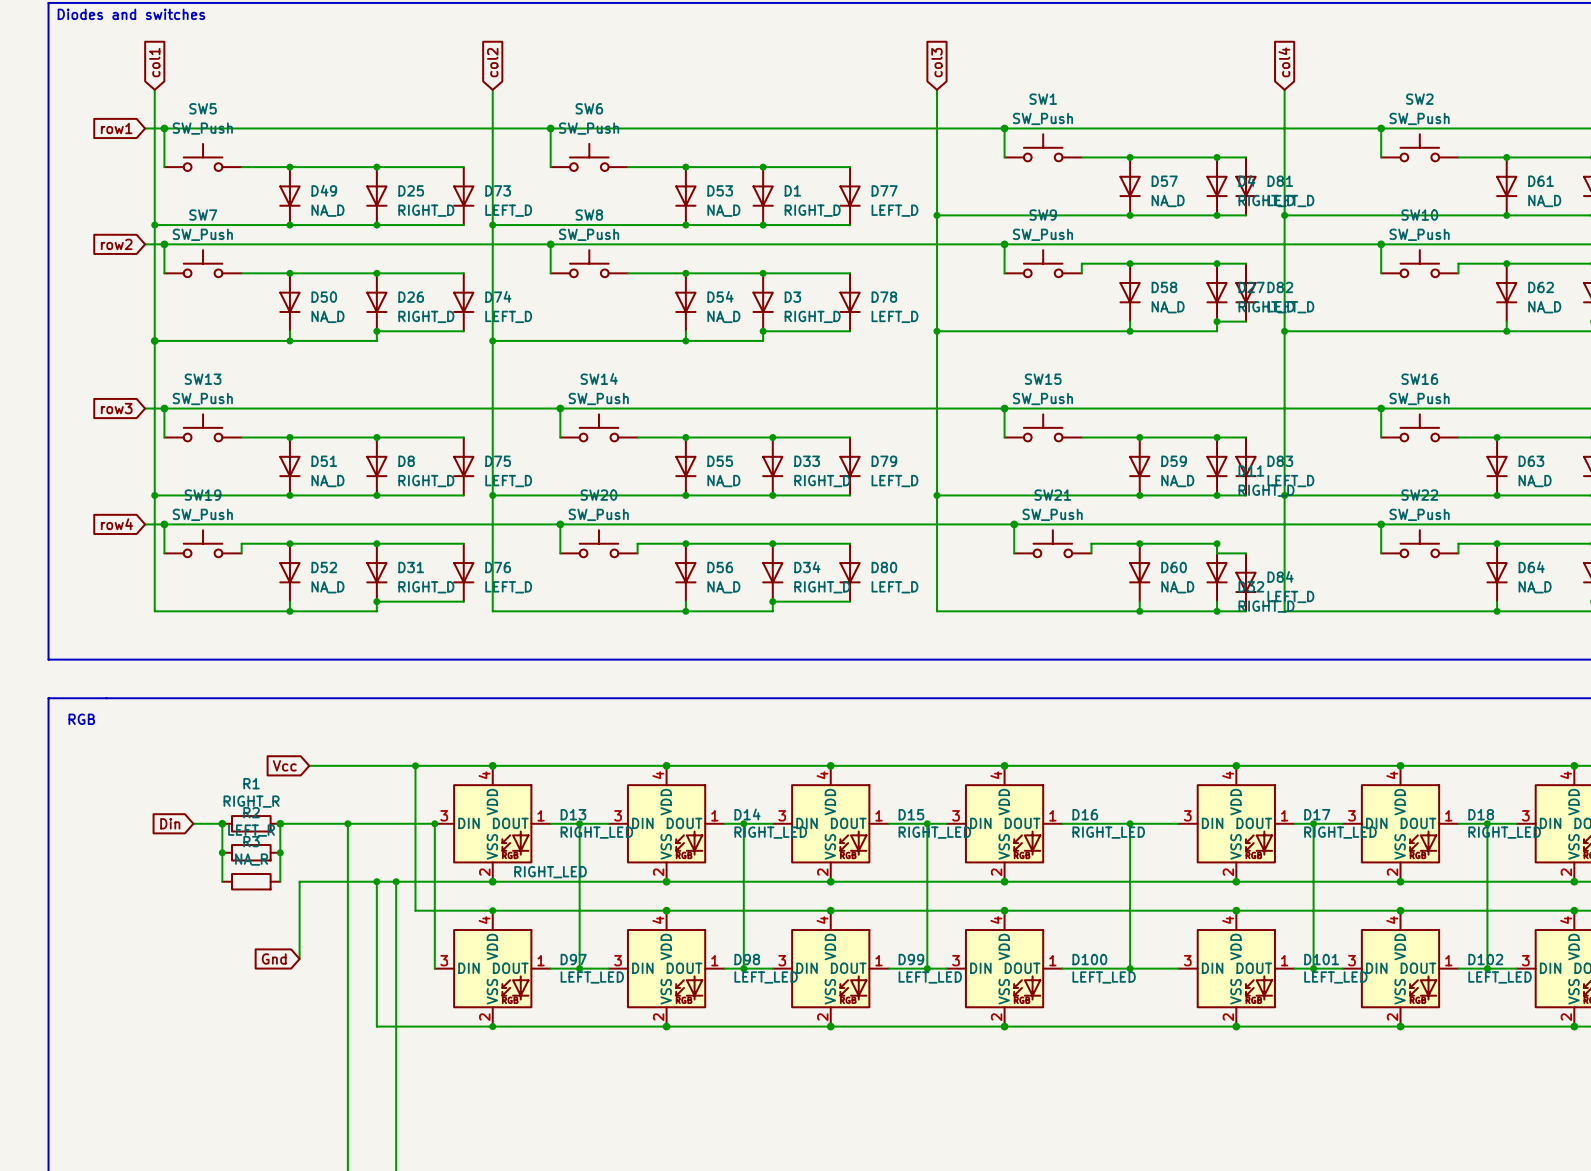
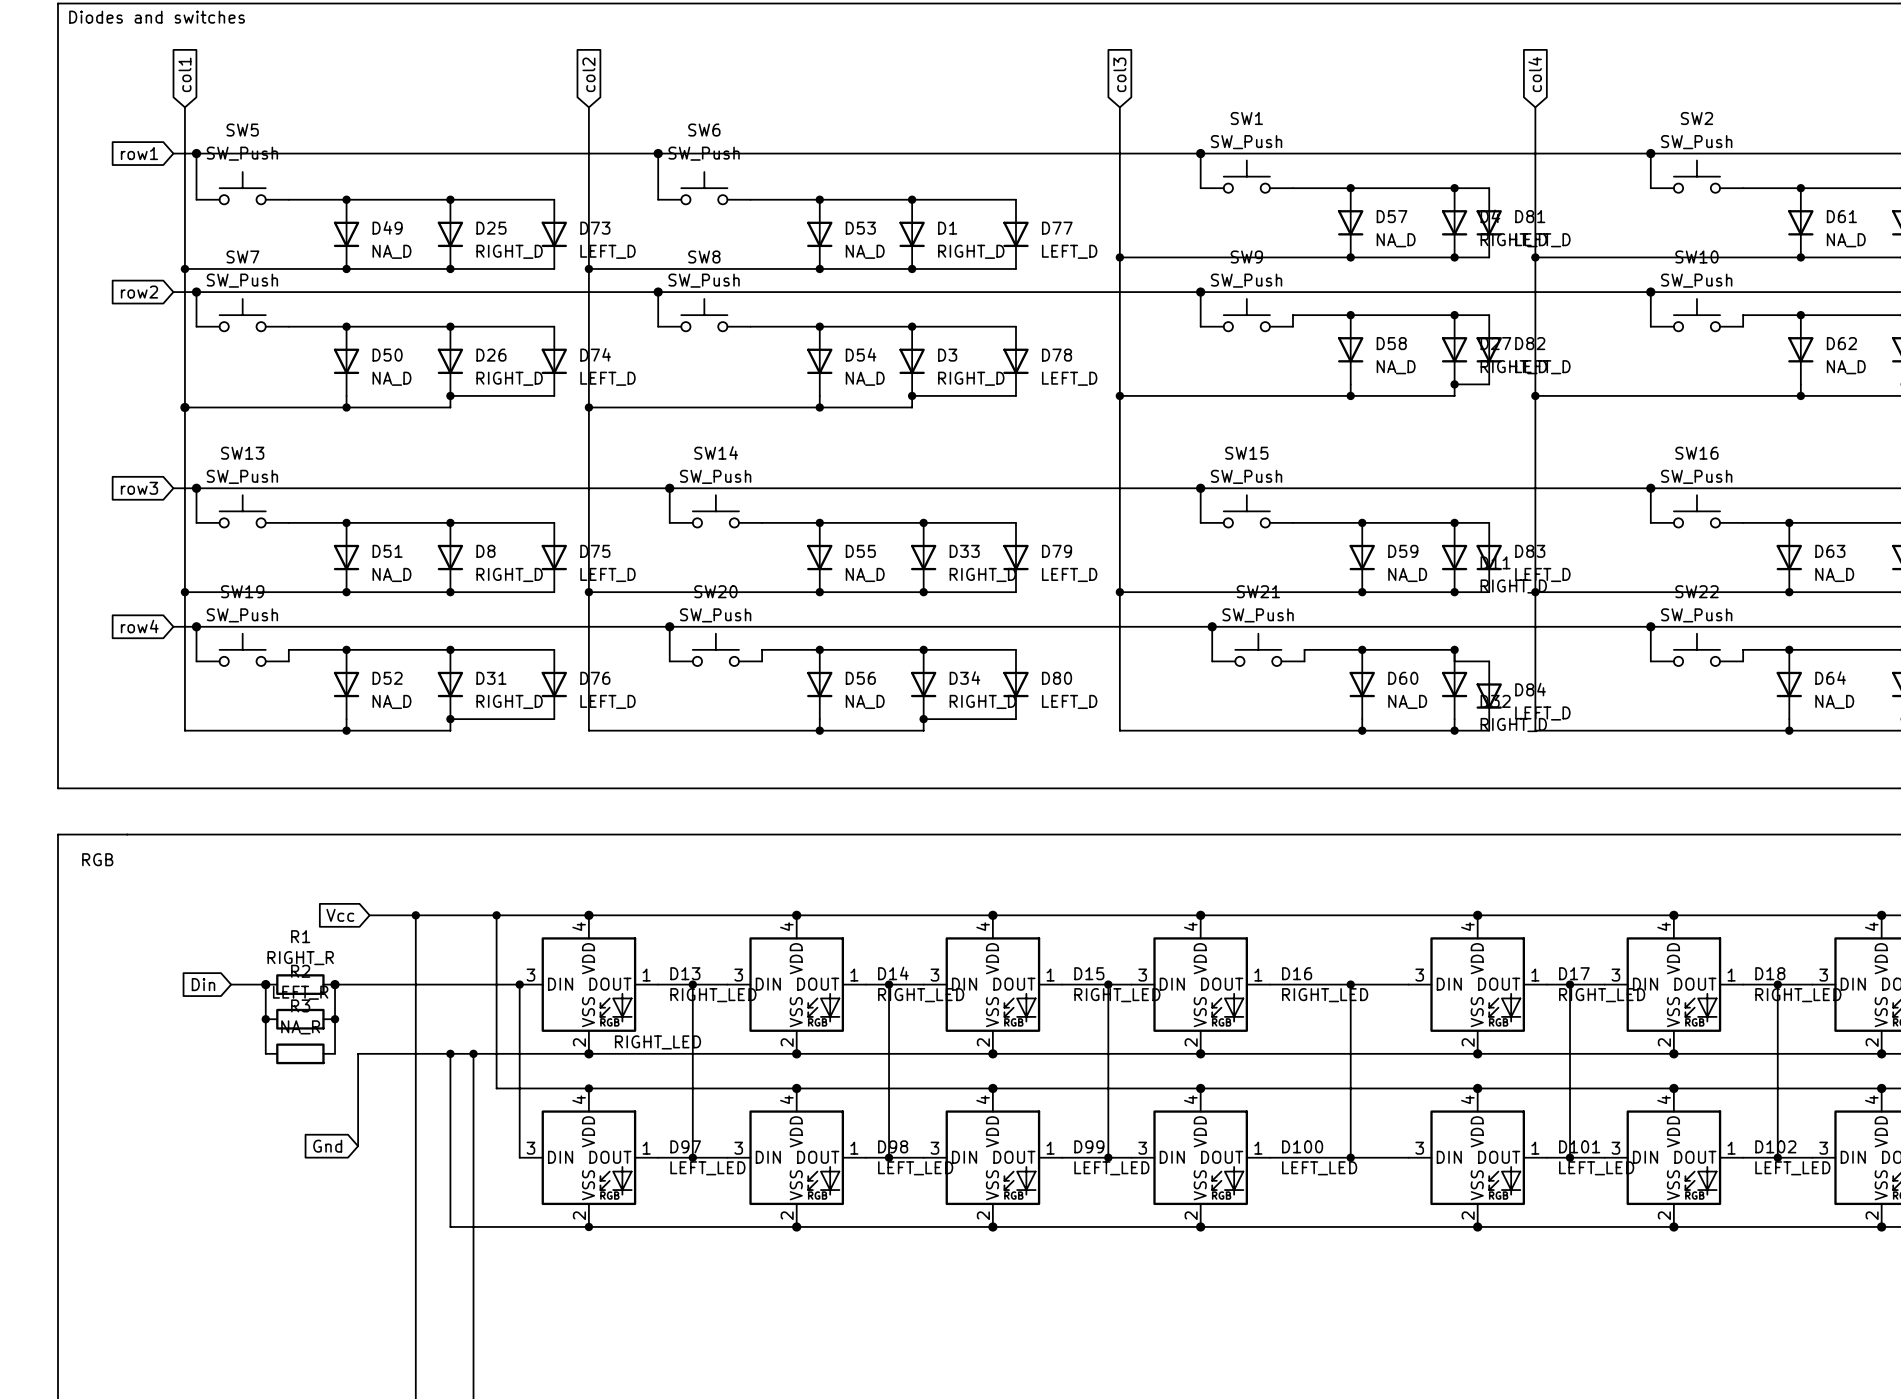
wire: none -> (415, 915) (415, 984)
junction: none -> (415, 915)
junction: (347, 823) -> none

